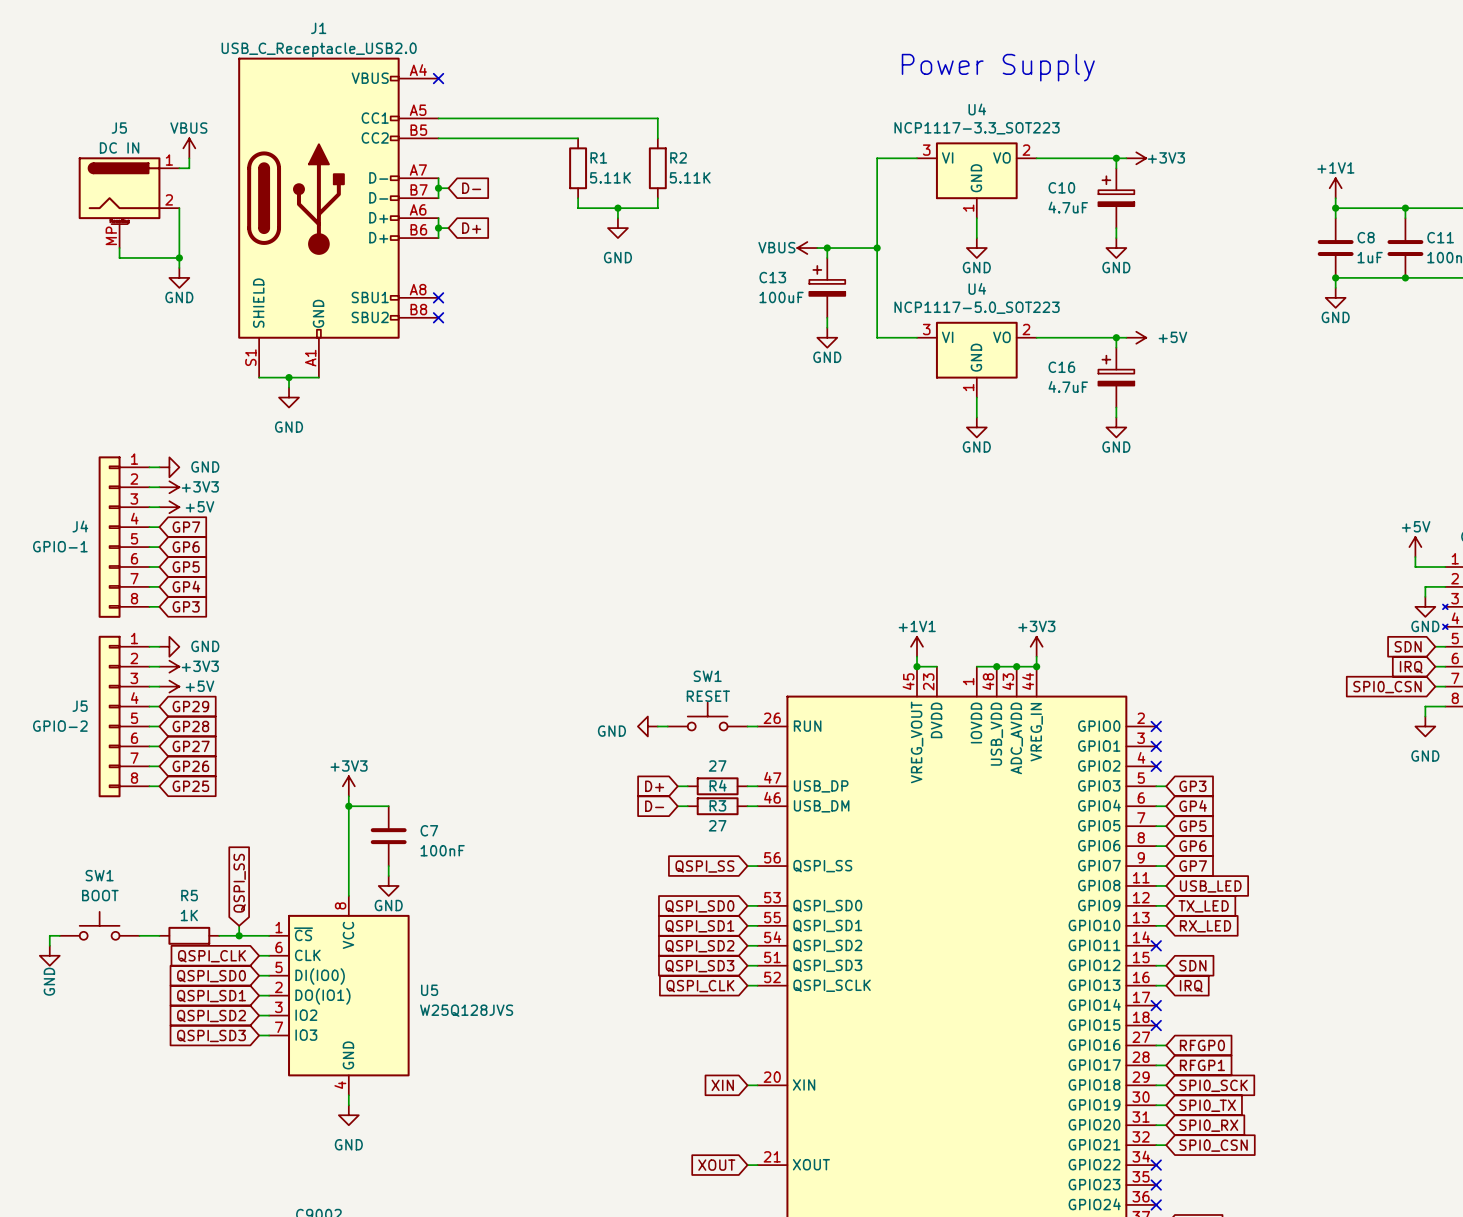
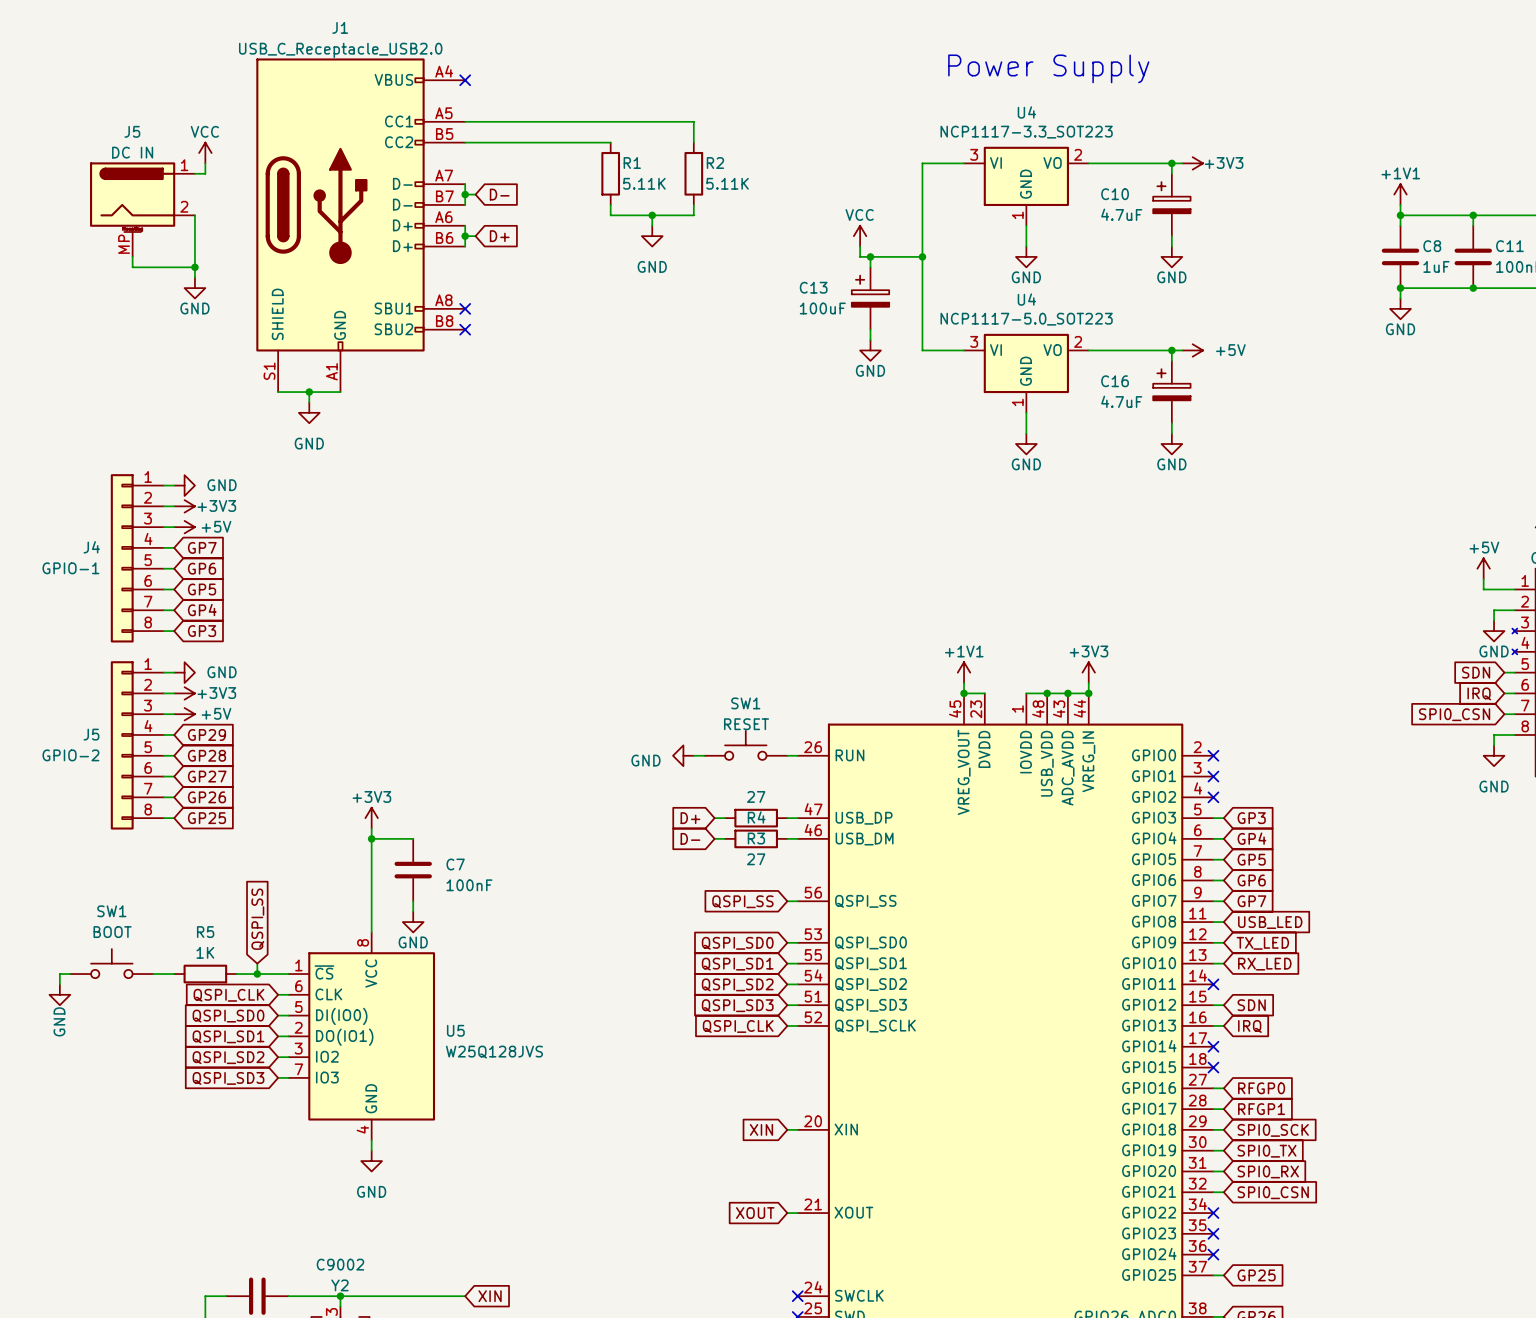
power symbol: VBUS (189, 148) -> VCC (205, 153)
power symbol: none -> VCC (860, 236)
wire: none -> (860, 246) (860, 256)
power symbol: VBUS (807, 248) -> none

